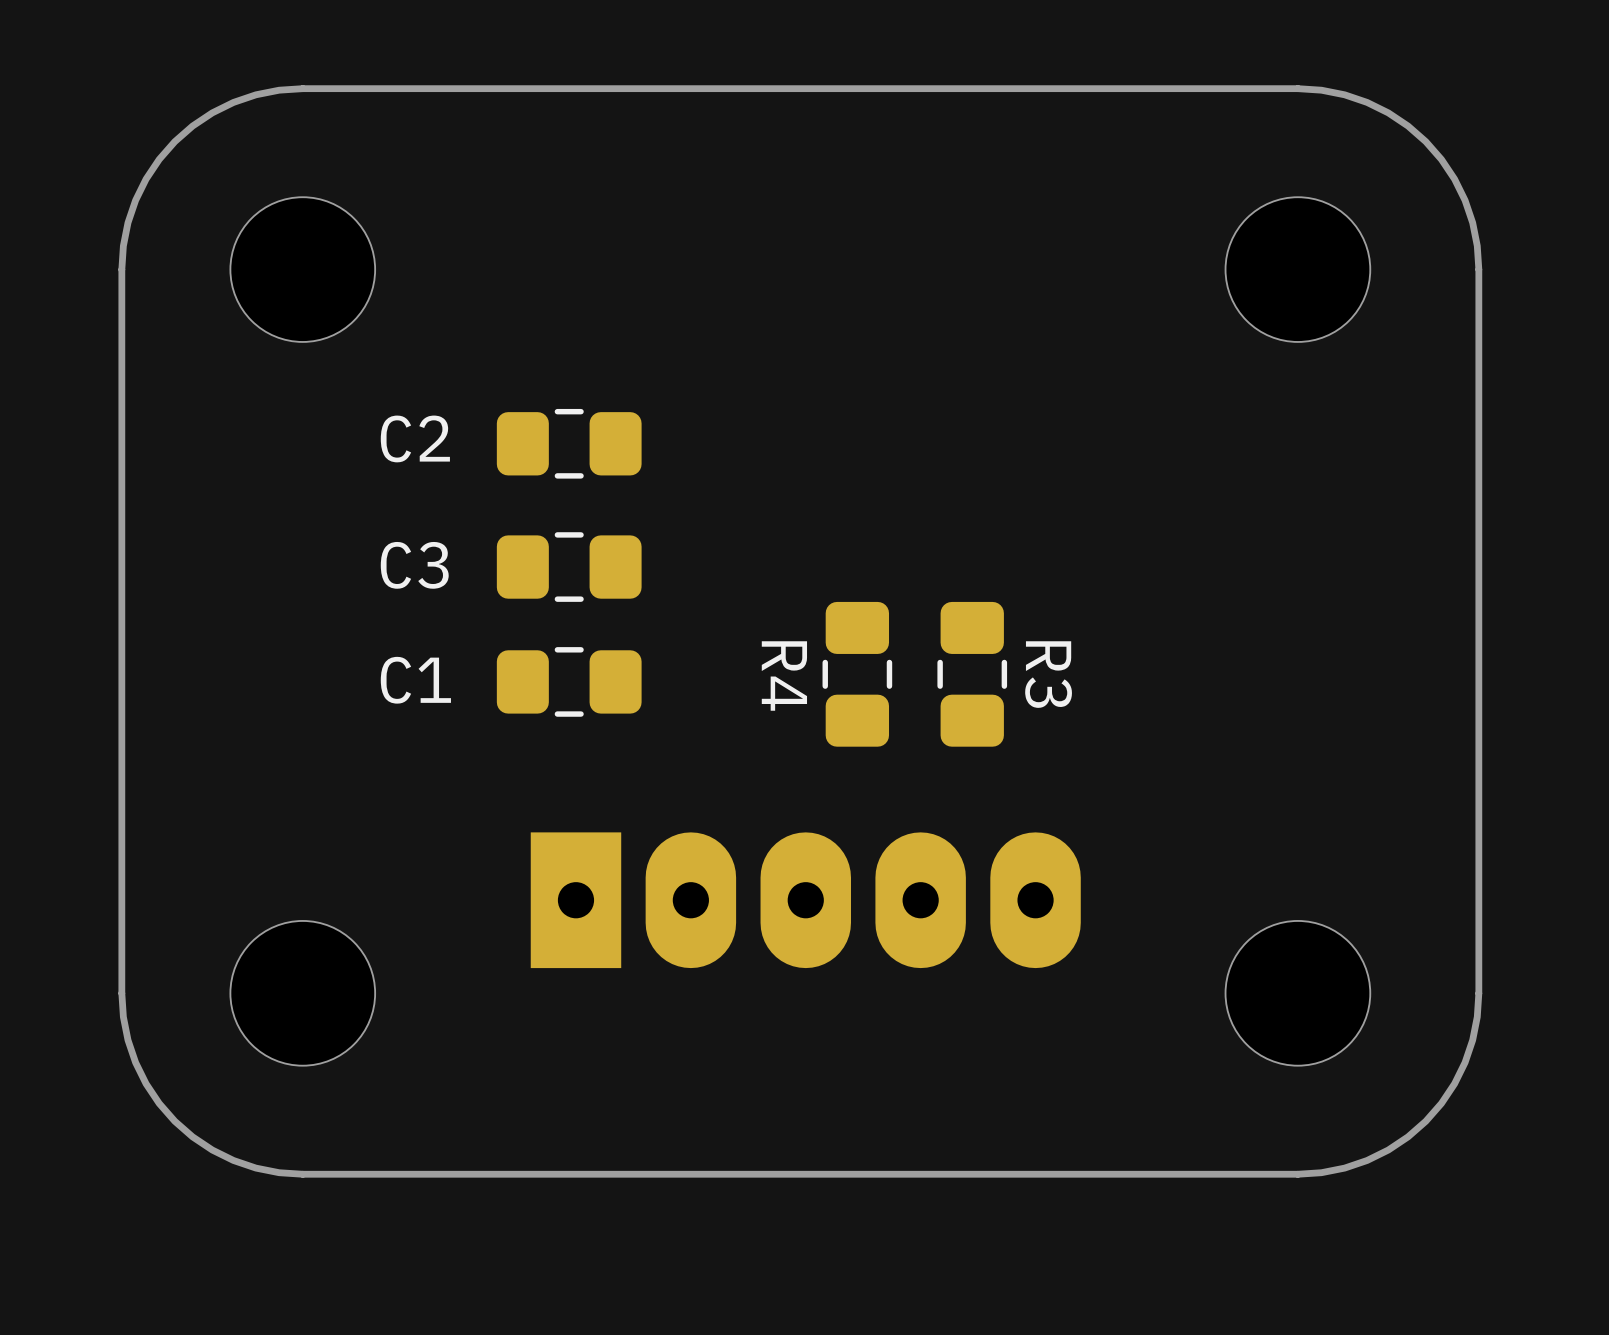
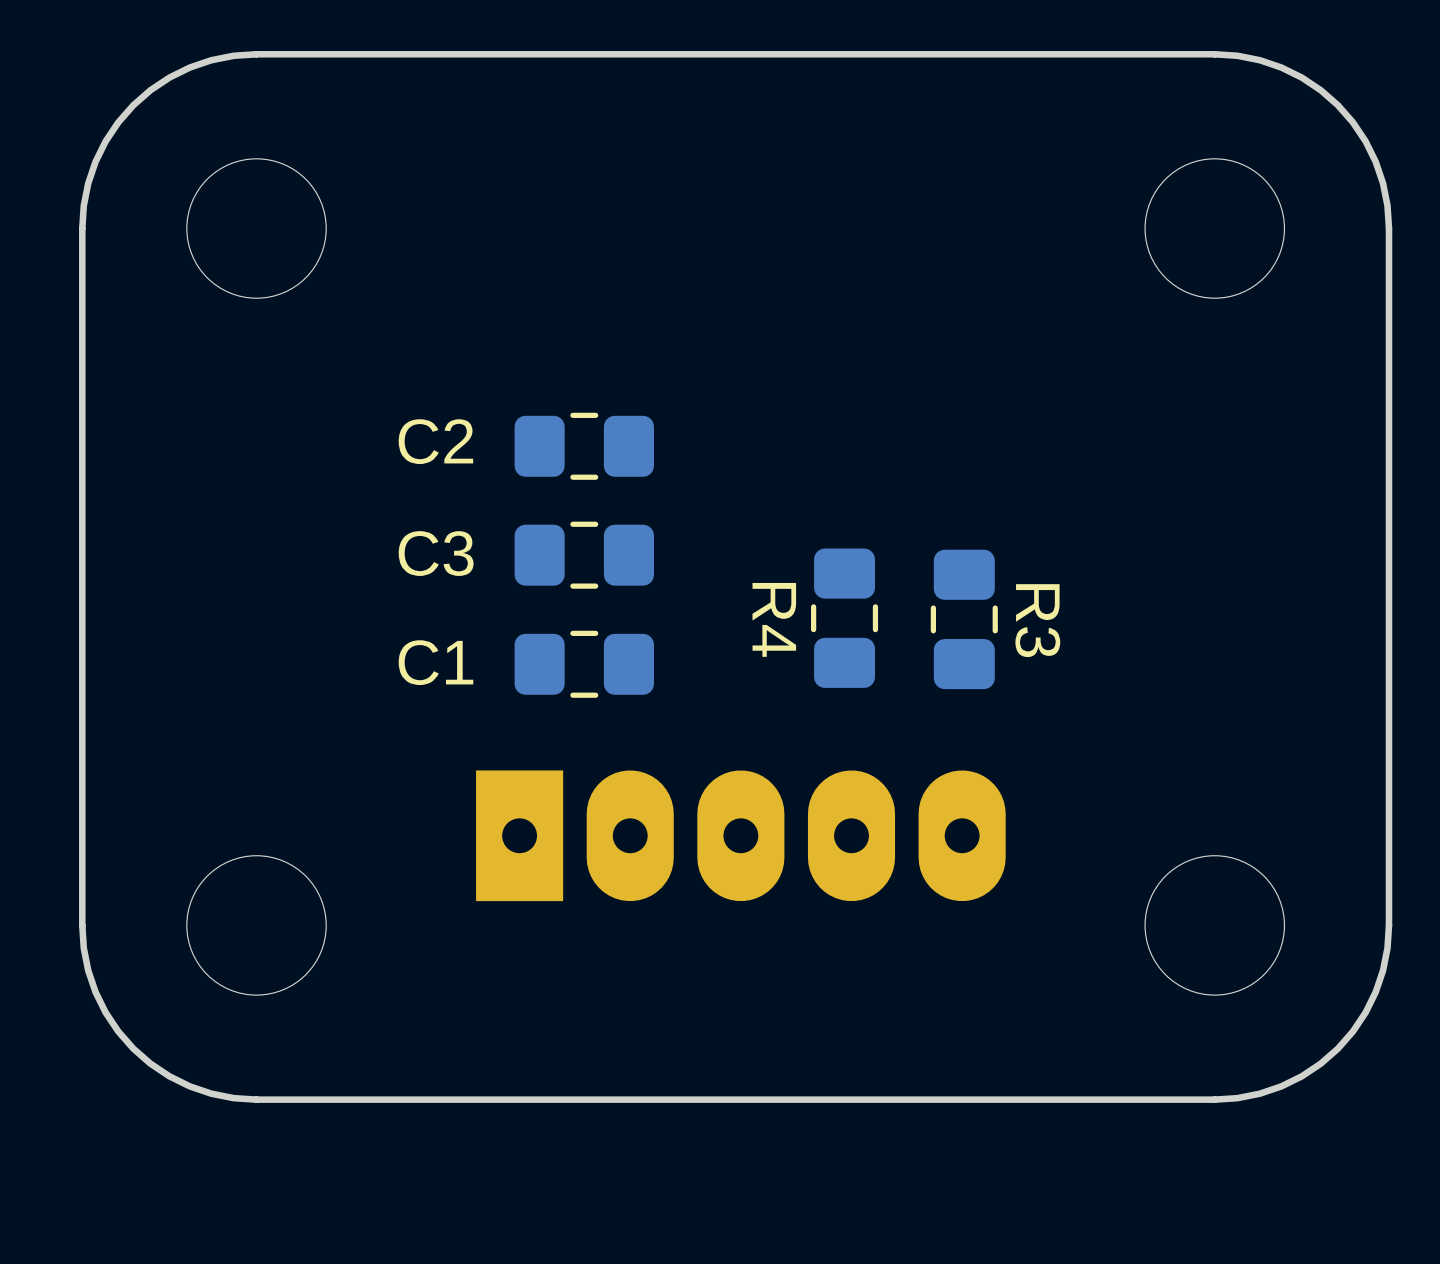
C2 position: (569, 443) -> (584, 446)
C3 position: (569, 567) -> (584, 555)
R4 position: (857, 674) -> (844, 618)
R3 position: (972, 674) -> (964, 619)
C1 position: (569, 681) -> (584, 664)

